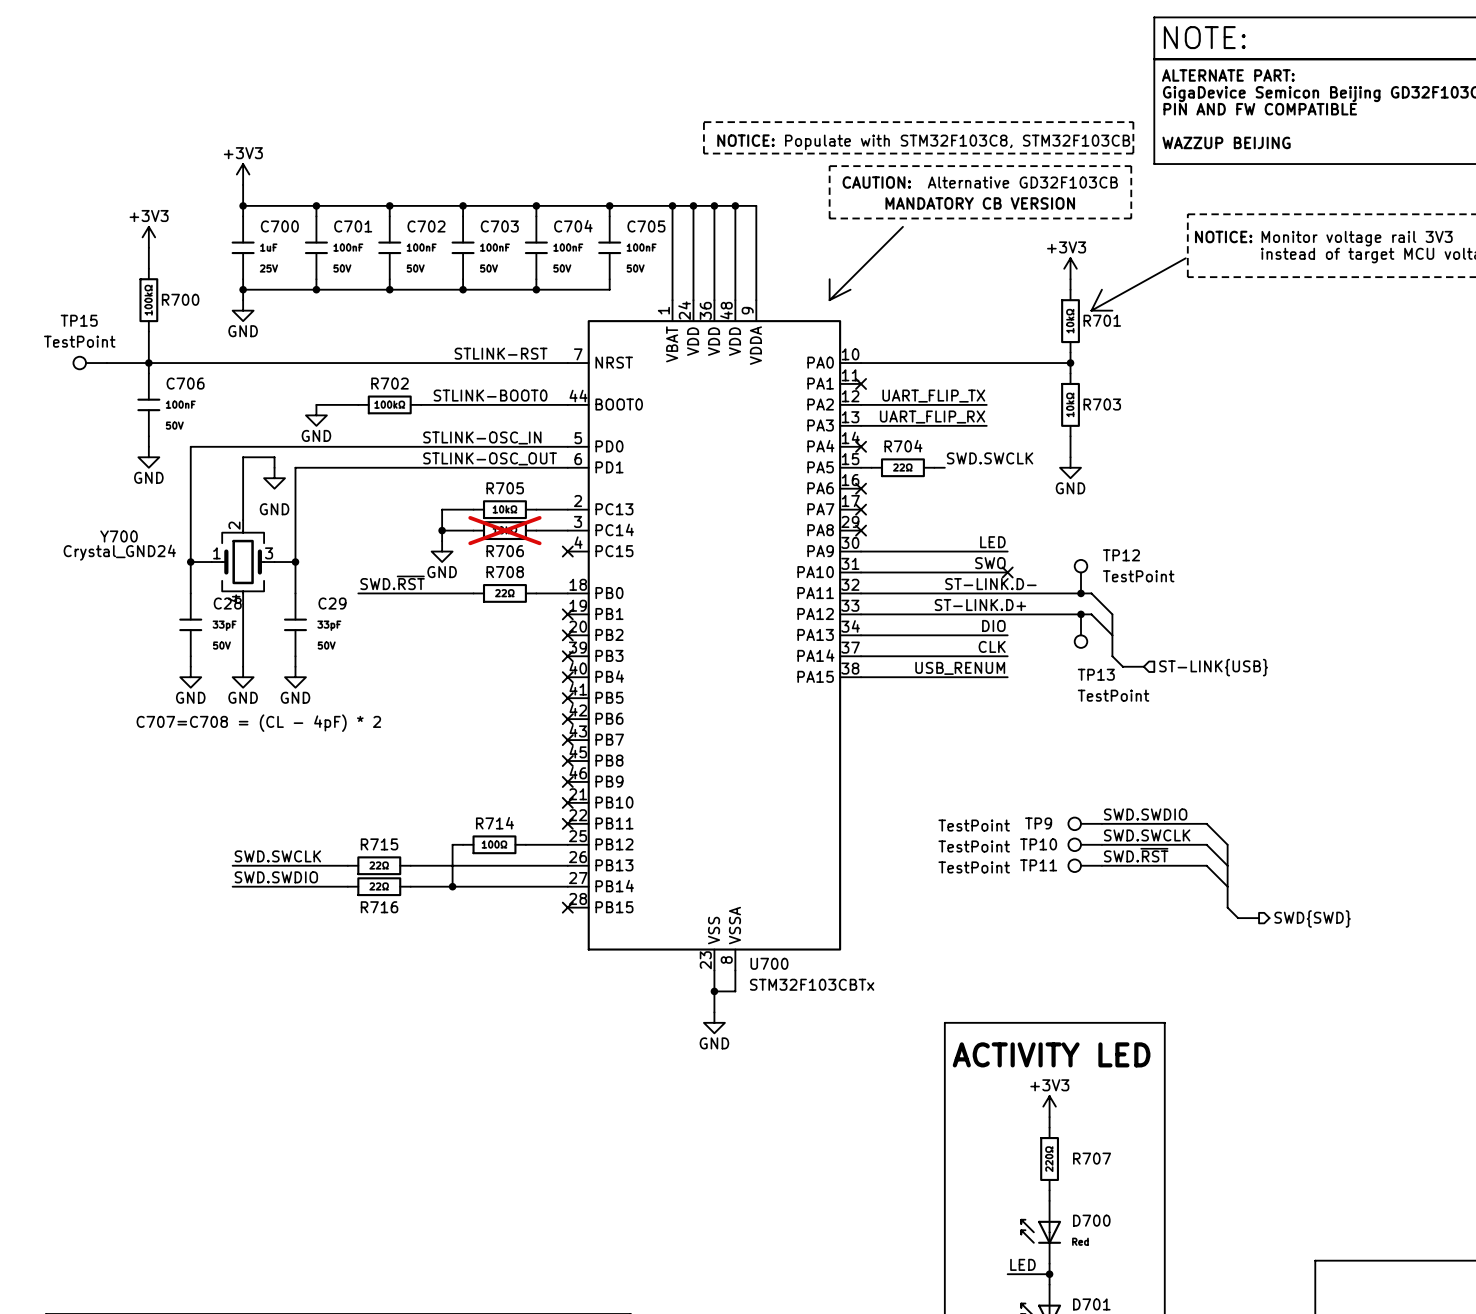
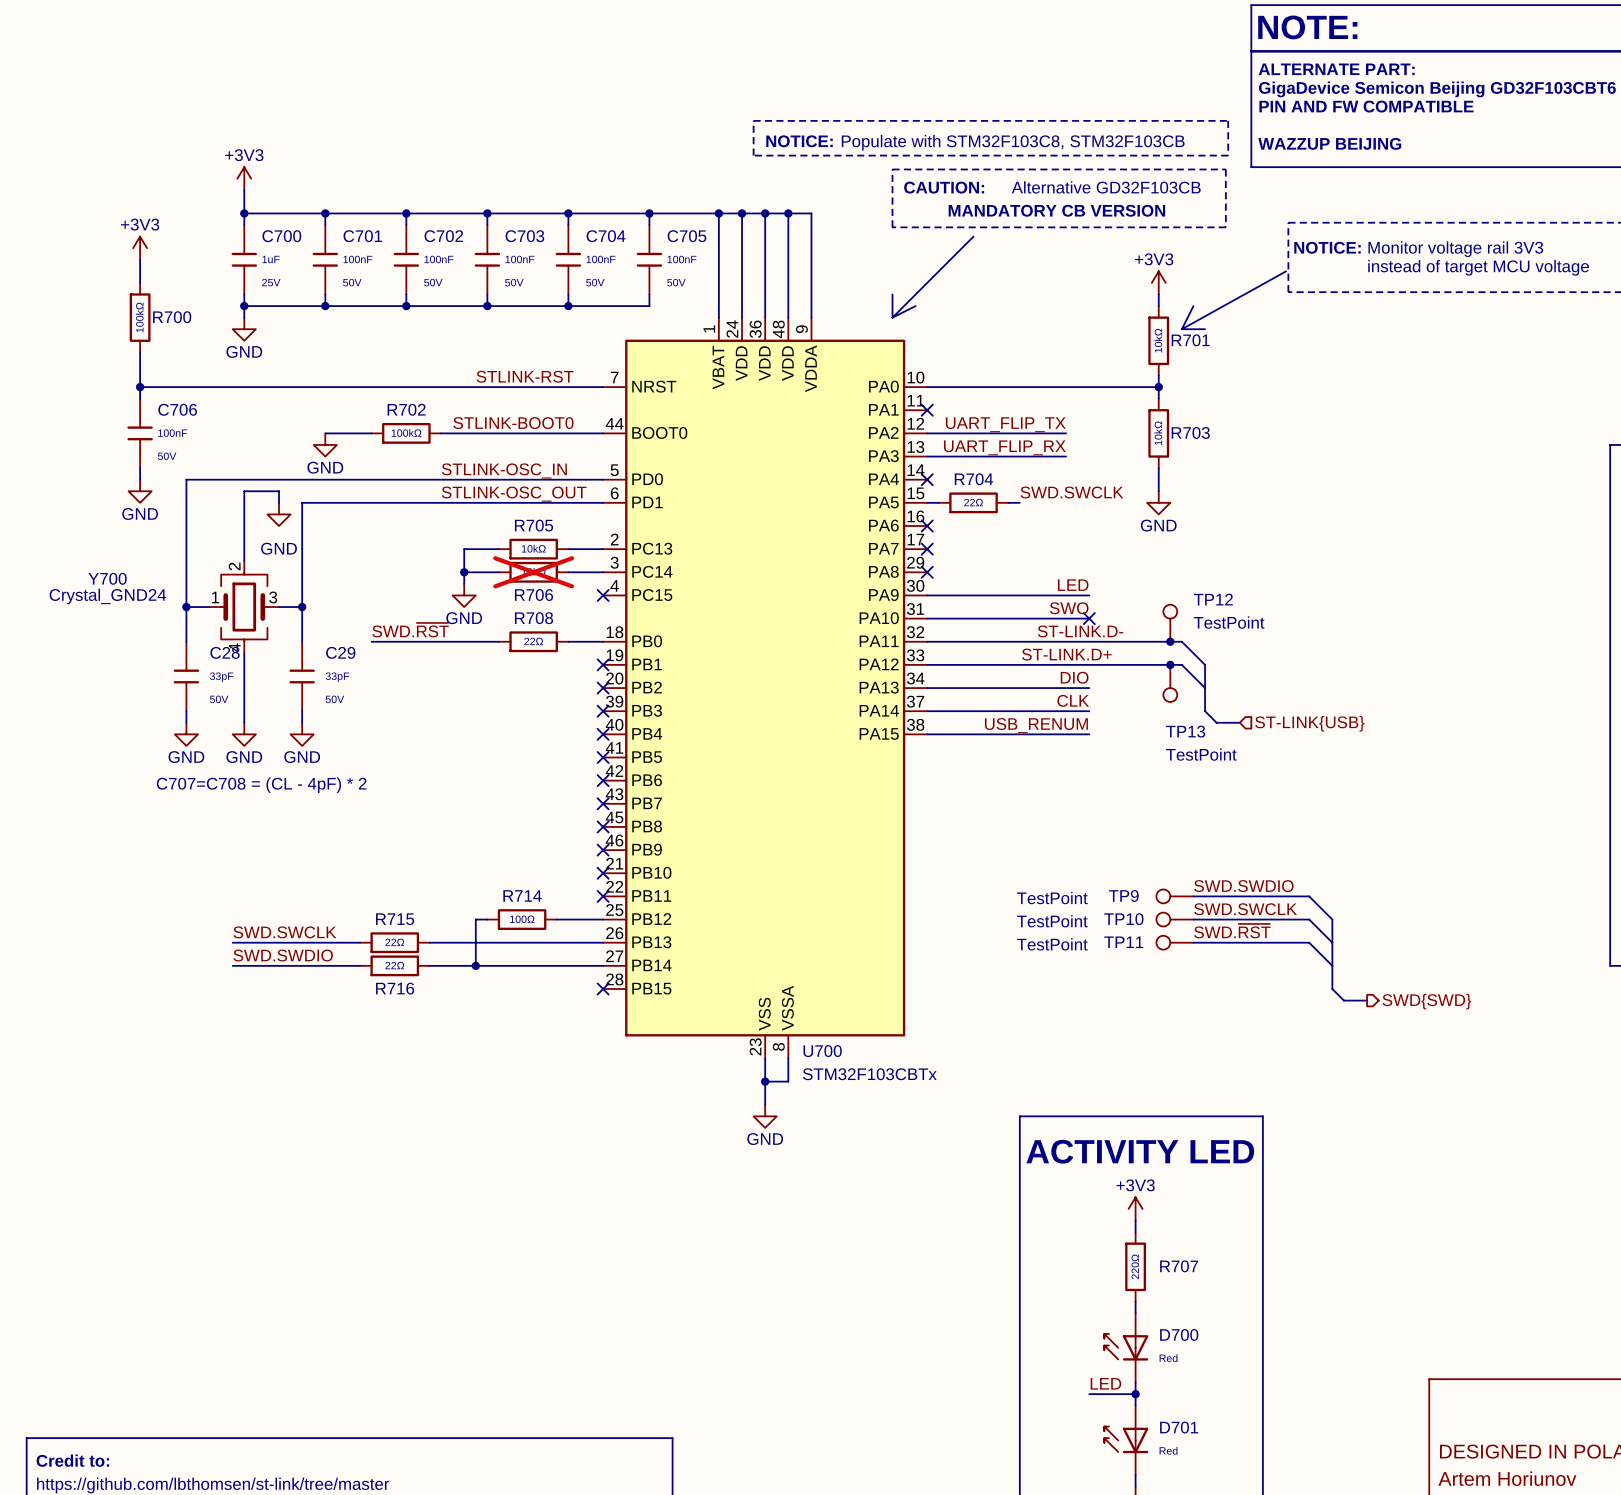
TP15: TestPoint (90, 363) -> none
wire: (106, 363) (148, 363) -> none

